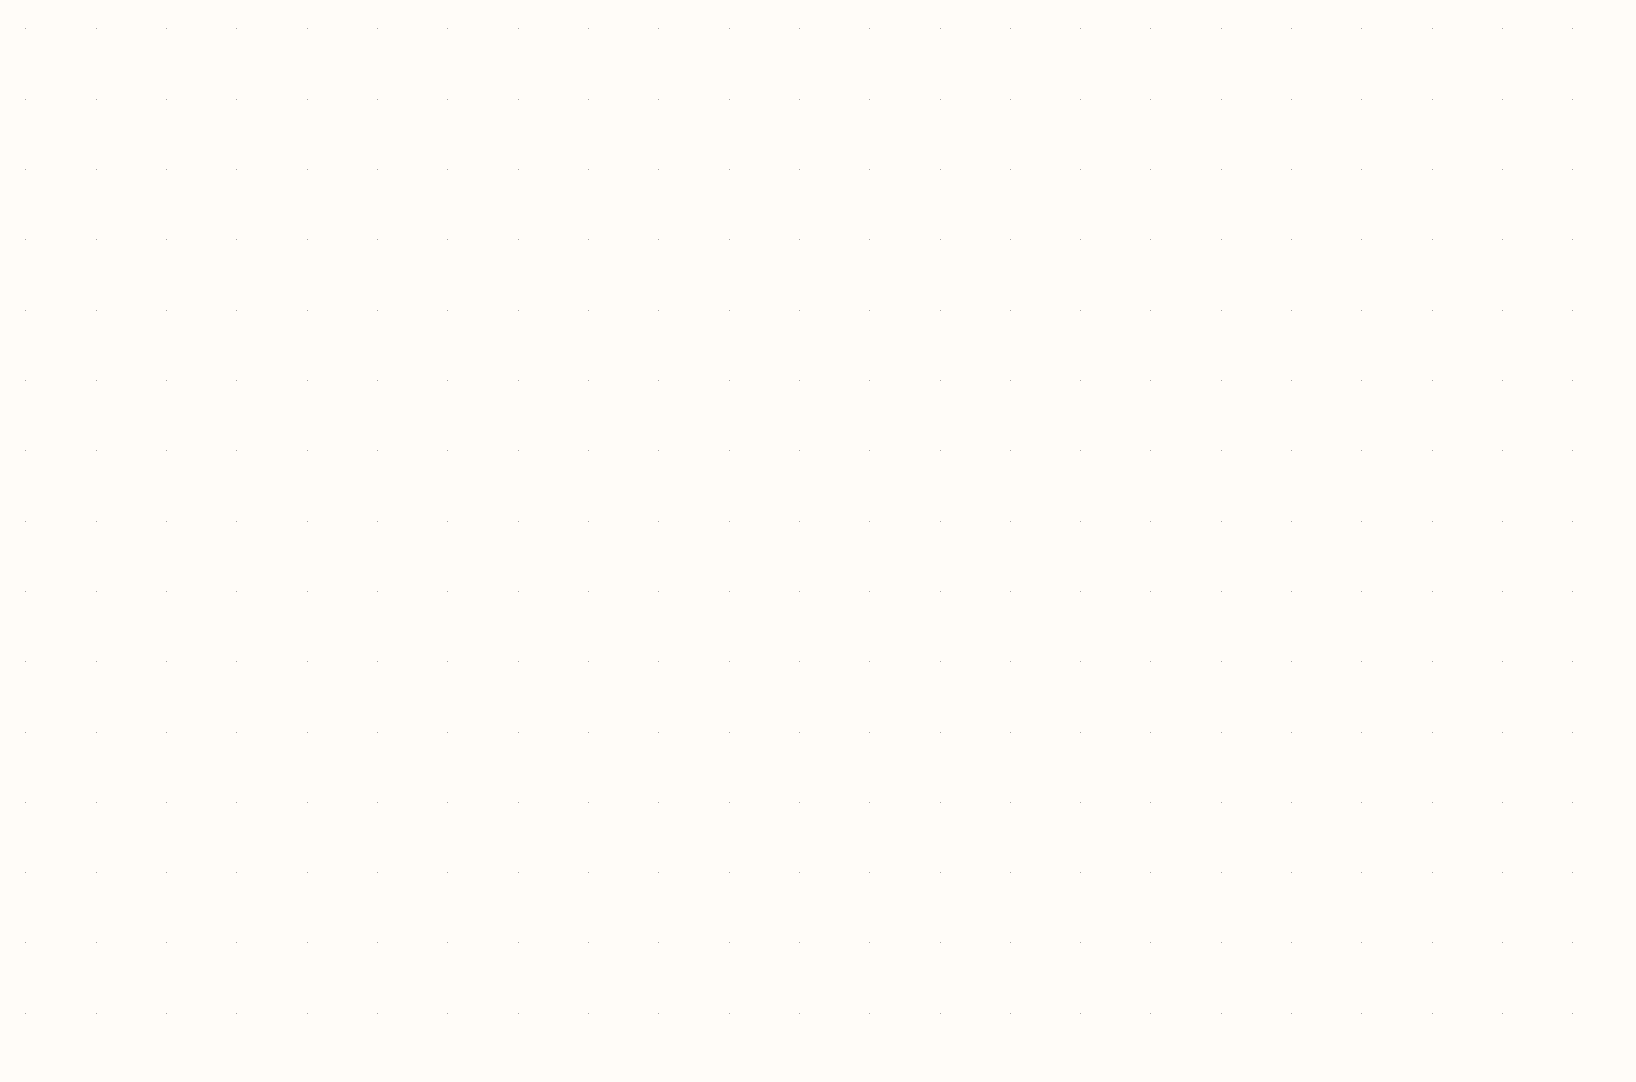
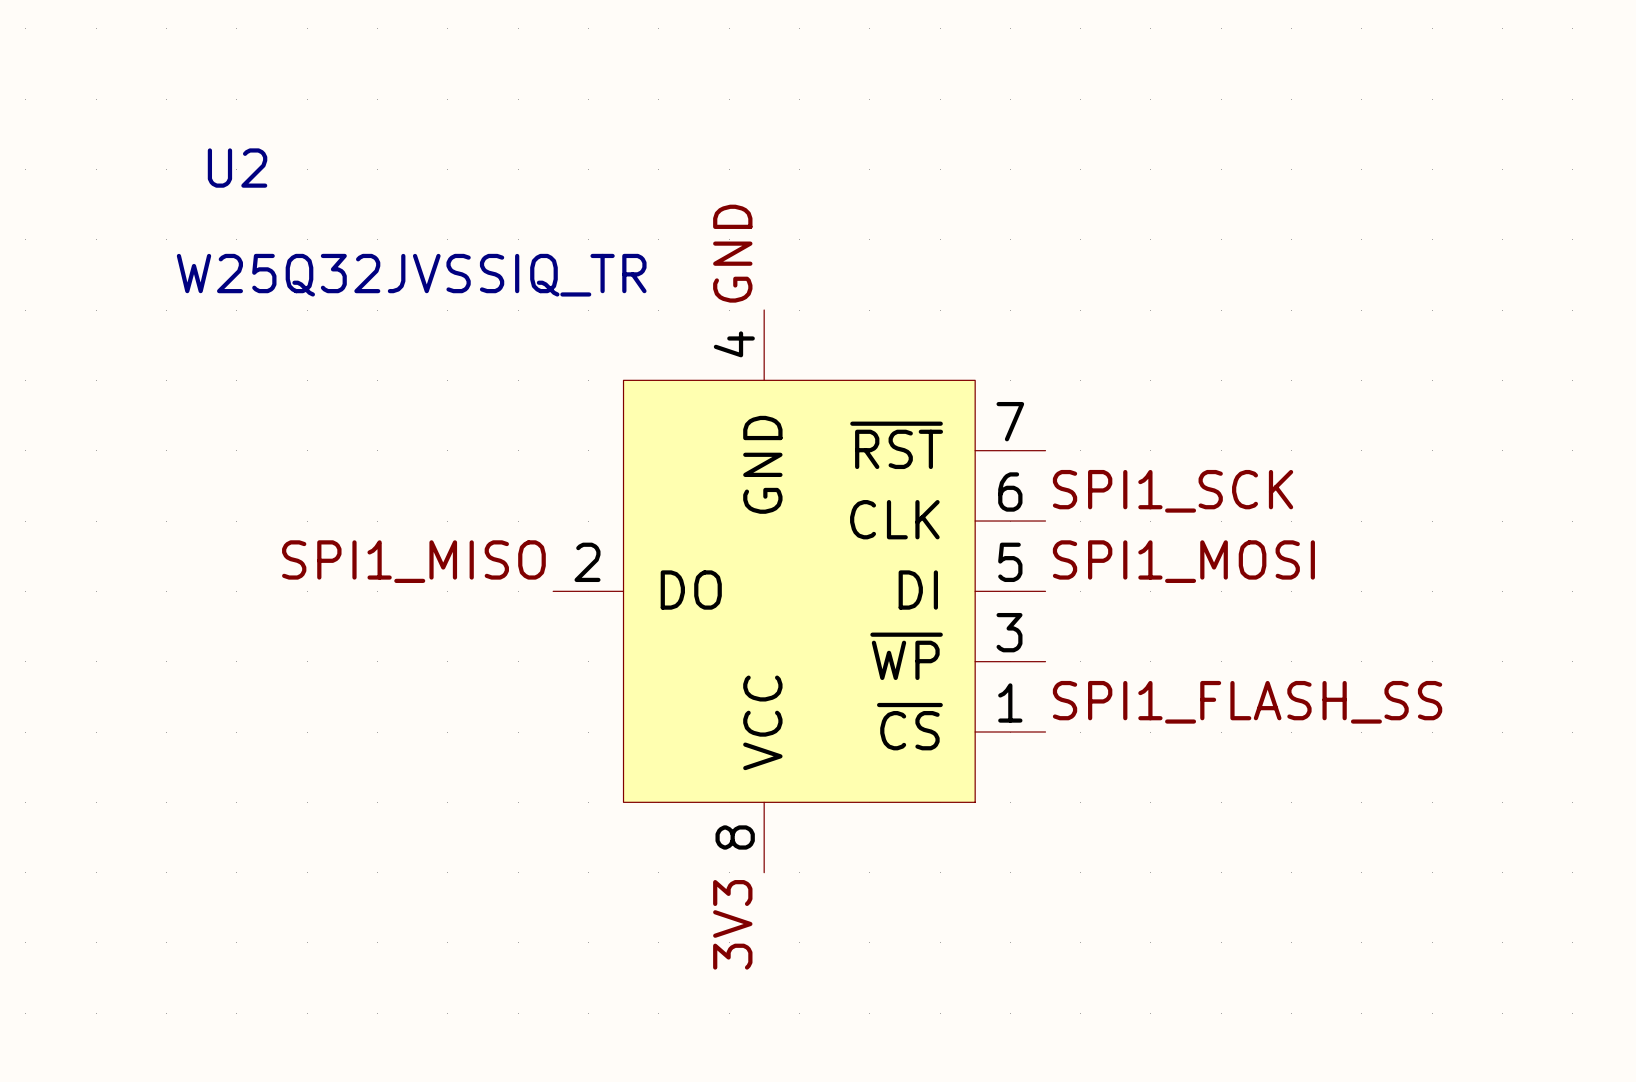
label: none -> GND (732, 253)
label: none -> SPI1_SCK (1173, 491)
label: none -> SPI1_MISO (413, 561)
label: none -> SPI1_MOSI (1183, 561)
U2: none -> W25Q32JVSSIQ_TR (799, 591)
label: none -> SPI1_FLASH_SS (1247, 702)
label: none -> 3V3 (732, 924)

